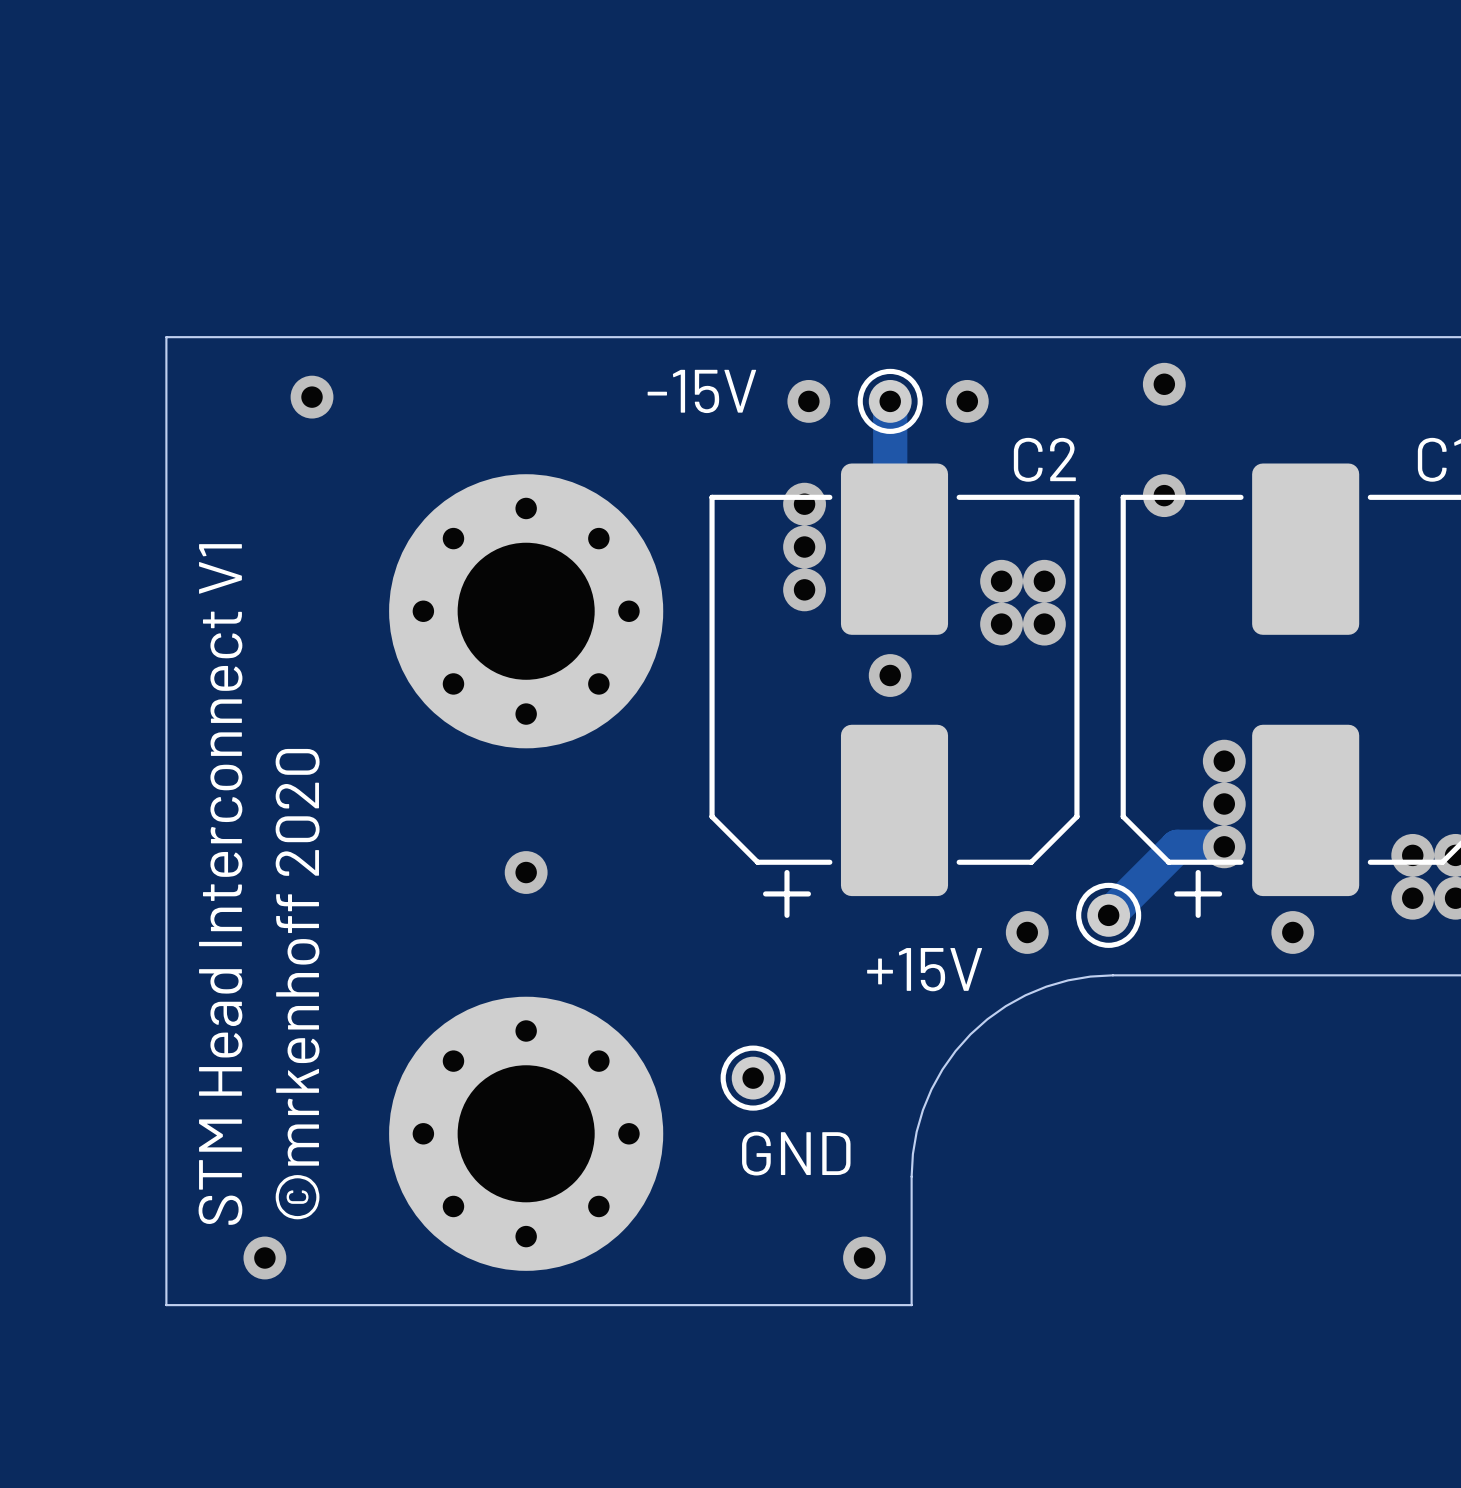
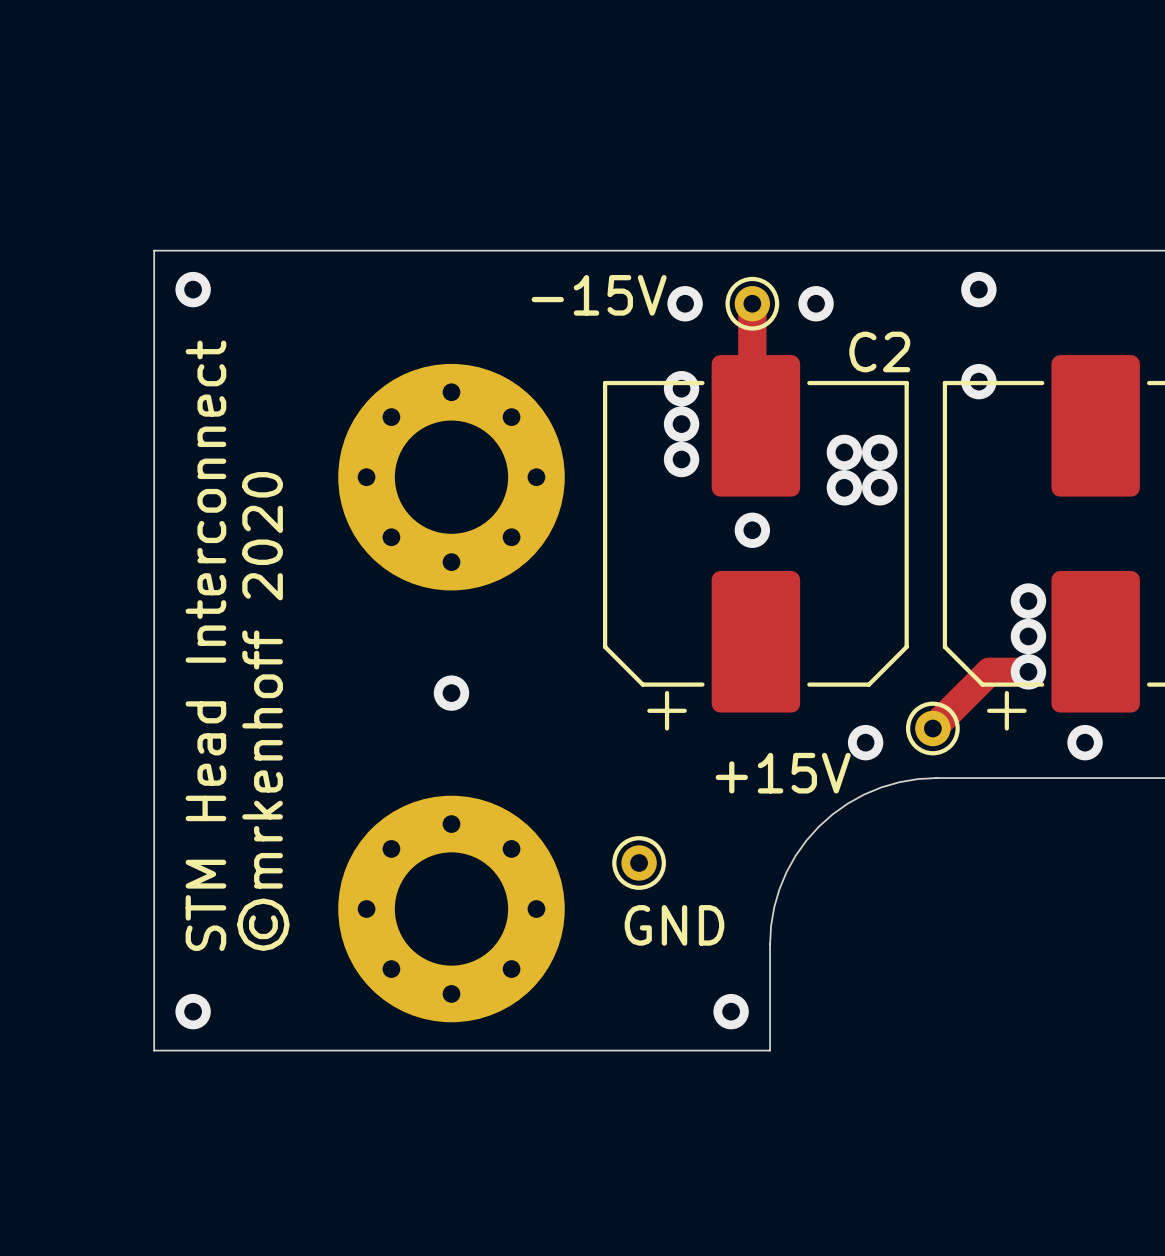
via position: (312, 397) -> (193, 289)
text: STM Head Interconnect V1 (220, 884) -> STM Head Interconnect (205, 645)
text position: ©mrkenhoff 2020 (297, 984) -> ©mrkenhoff 2020 (263, 711)
via position: (264, 1258) -> (193, 1011)

